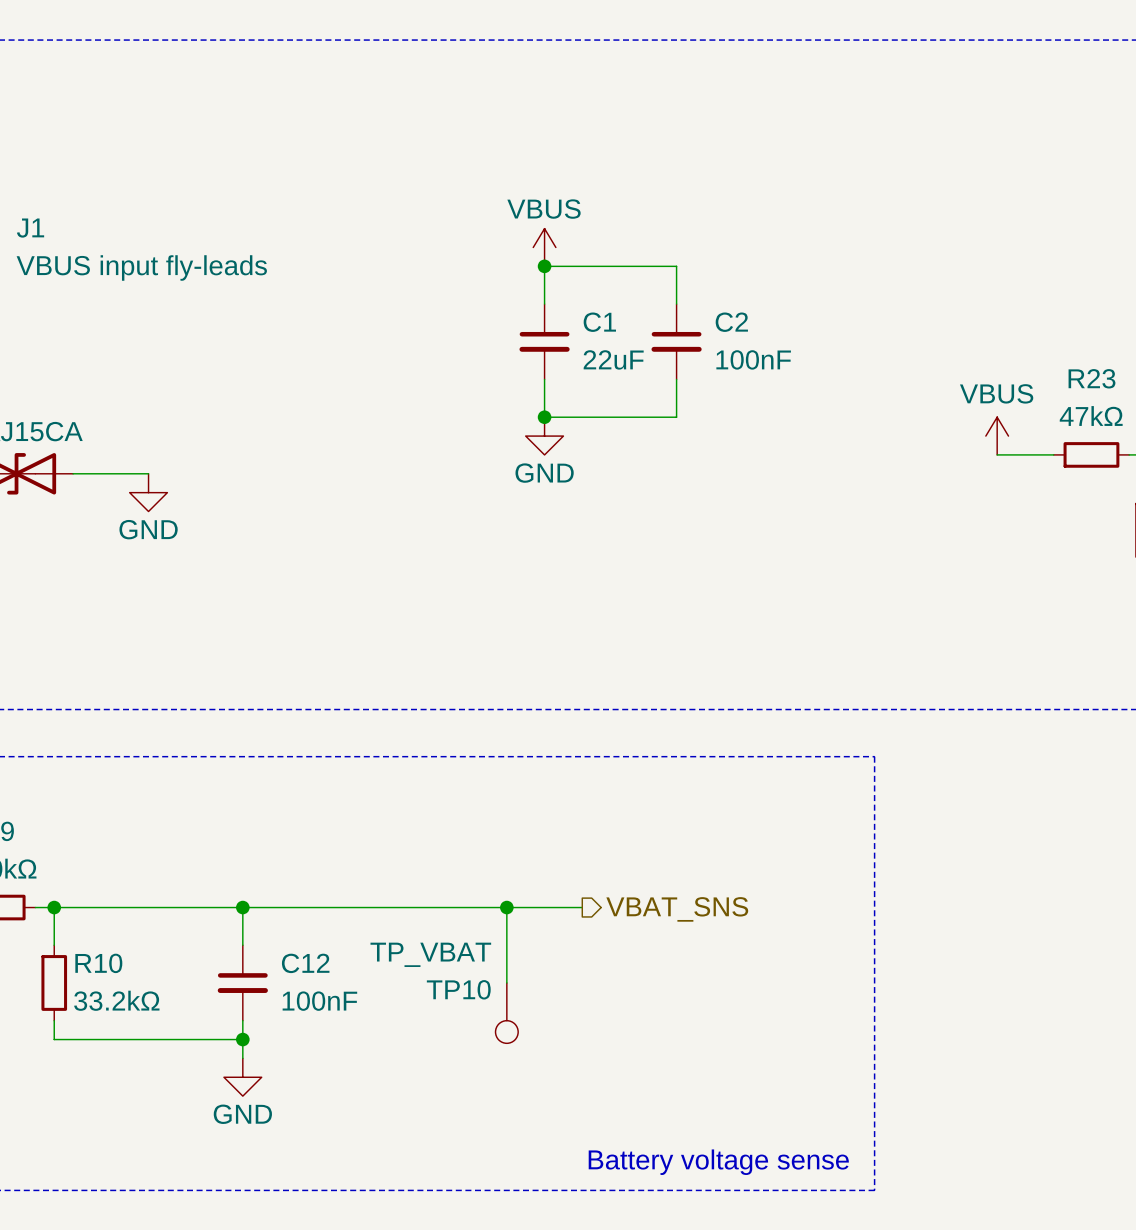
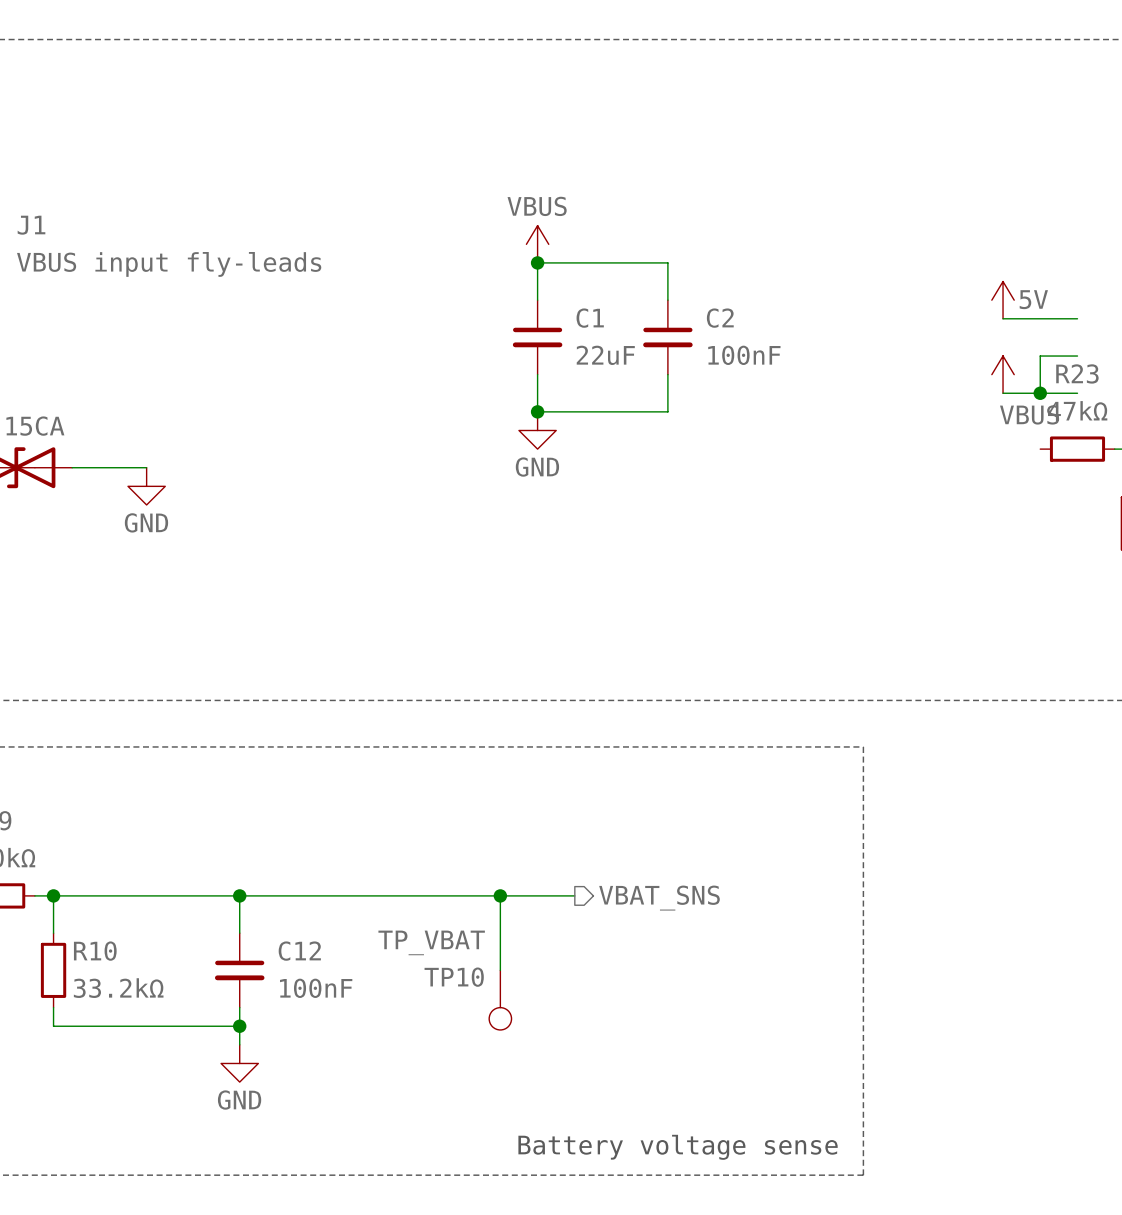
power symbol: none -> 5V (1003, 300)
wire: none -> (1003, 318) (1077, 318)
wire: none -> (1077, 356) (1040, 356) (1040, 393)
power symbol text position: VBUS (996, 393) -> VBUS (1029, 414)
wire: none -> (1003, 393) (1077, 393)
junction: none -> (1040, 393)
power symbol position: VBUS (997, 436) -> VBUS (1003, 374)
wire: (997, 454) (1053, 454) -> none

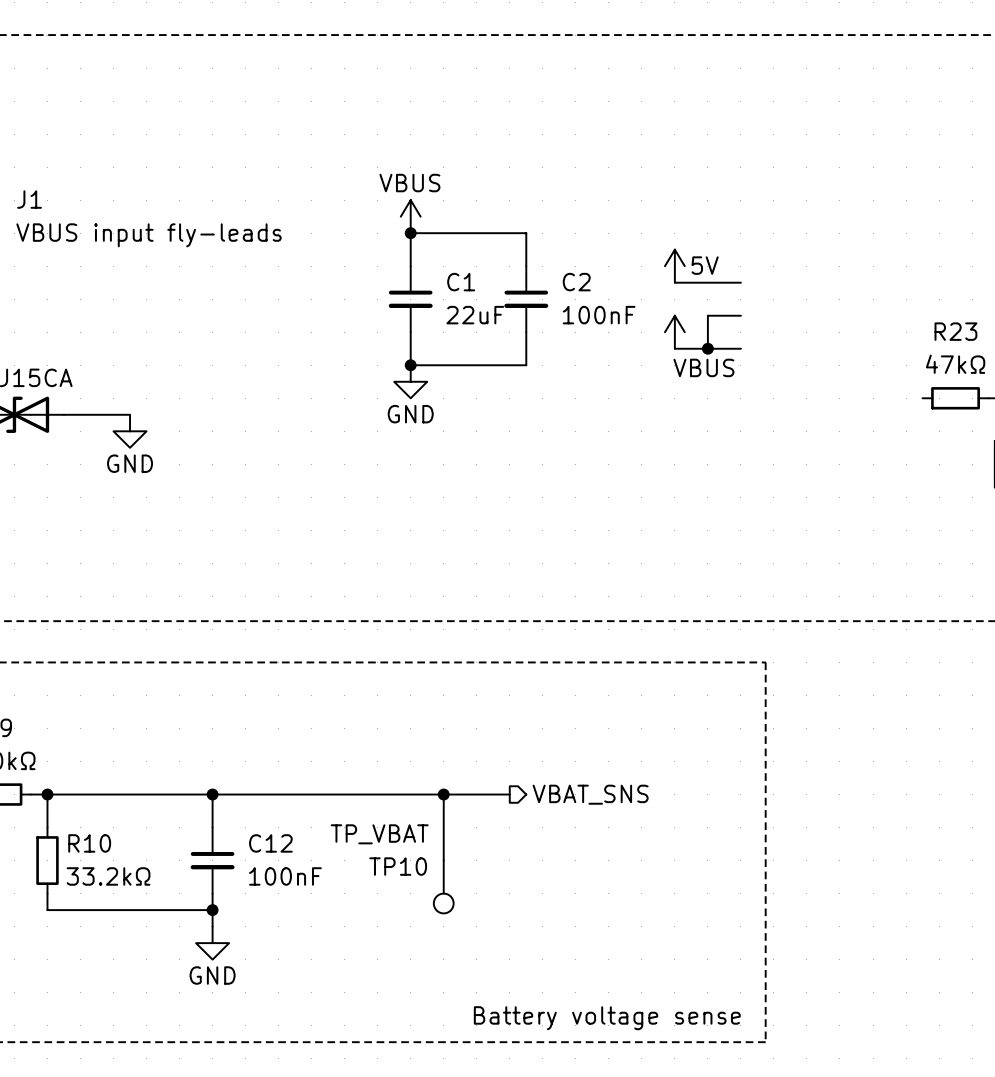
power symbol position: VBUS (537, 244) -> VBUS (410, 216)
wire: (537, 262) (537, 300) -> (476, 233) (410, 233) (410, 266)
junction position: (537, 262) -> (410, 233)
wire: (593, 262) (667, 262) (667, 300) -> (526, 233) (526, 266)
power symbol: none -> 5V (674, 266)
power symbol: 5V (1003, 300) -> none
wire: (1003, 318) (1077, 318) -> (674, 282) (740, 282)
C1 position: (537, 337) -> (410, 299)
C2 position: (667, 337) -> (526, 299)
wire: (1077, 356) (1040, 356) (1040, 393) -> (740, 315) (707, 315) (707, 348)
wire: (537, 374) (537, 411) -> (410, 332) (410, 365) (476, 365)
wire: (667, 374) (667, 411) (593, 411) -> (526, 332) (526, 365)
power symbol: none -> VBUS (674, 332)
power symbol: VBUS (1003, 374) -> none
junction: none -> (707, 348)
wire: (1003, 393) (1077, 393) -> (674, 348) (740, 348)
junction: (1040, 393) -> none
junction position: (537, 411) -> (410, 365)
power symbol position: GND (537, 430) -> GND (410, 381)

